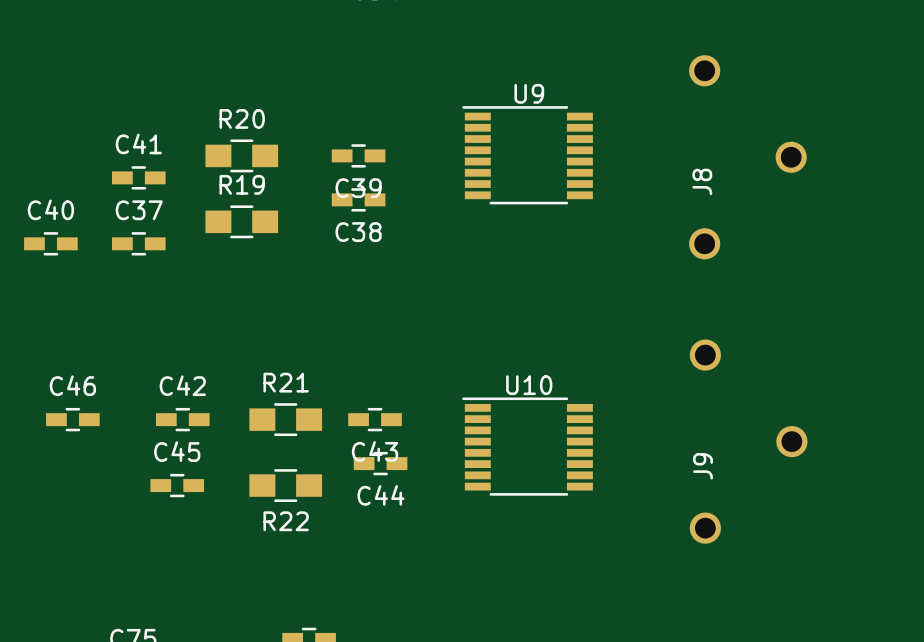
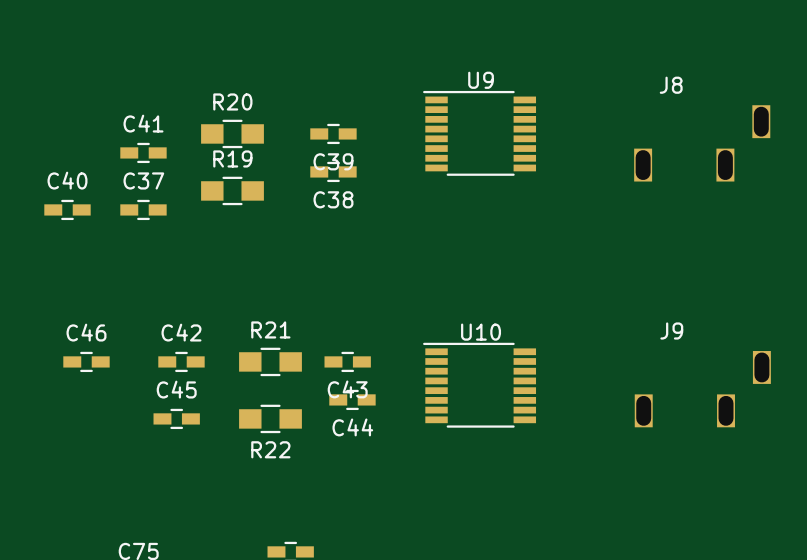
J8 footprint: [689, 55, 807, 260] -> [634, 105, 771, 182]
J8 name position: J8 (702, 181) -> J8 (671, 85)
J9 footprint: [689, 339, 808, 544] -> [634, 351, 771, 428]
J9 name position: J9 (702, 466) -> J9 (671, 331)

